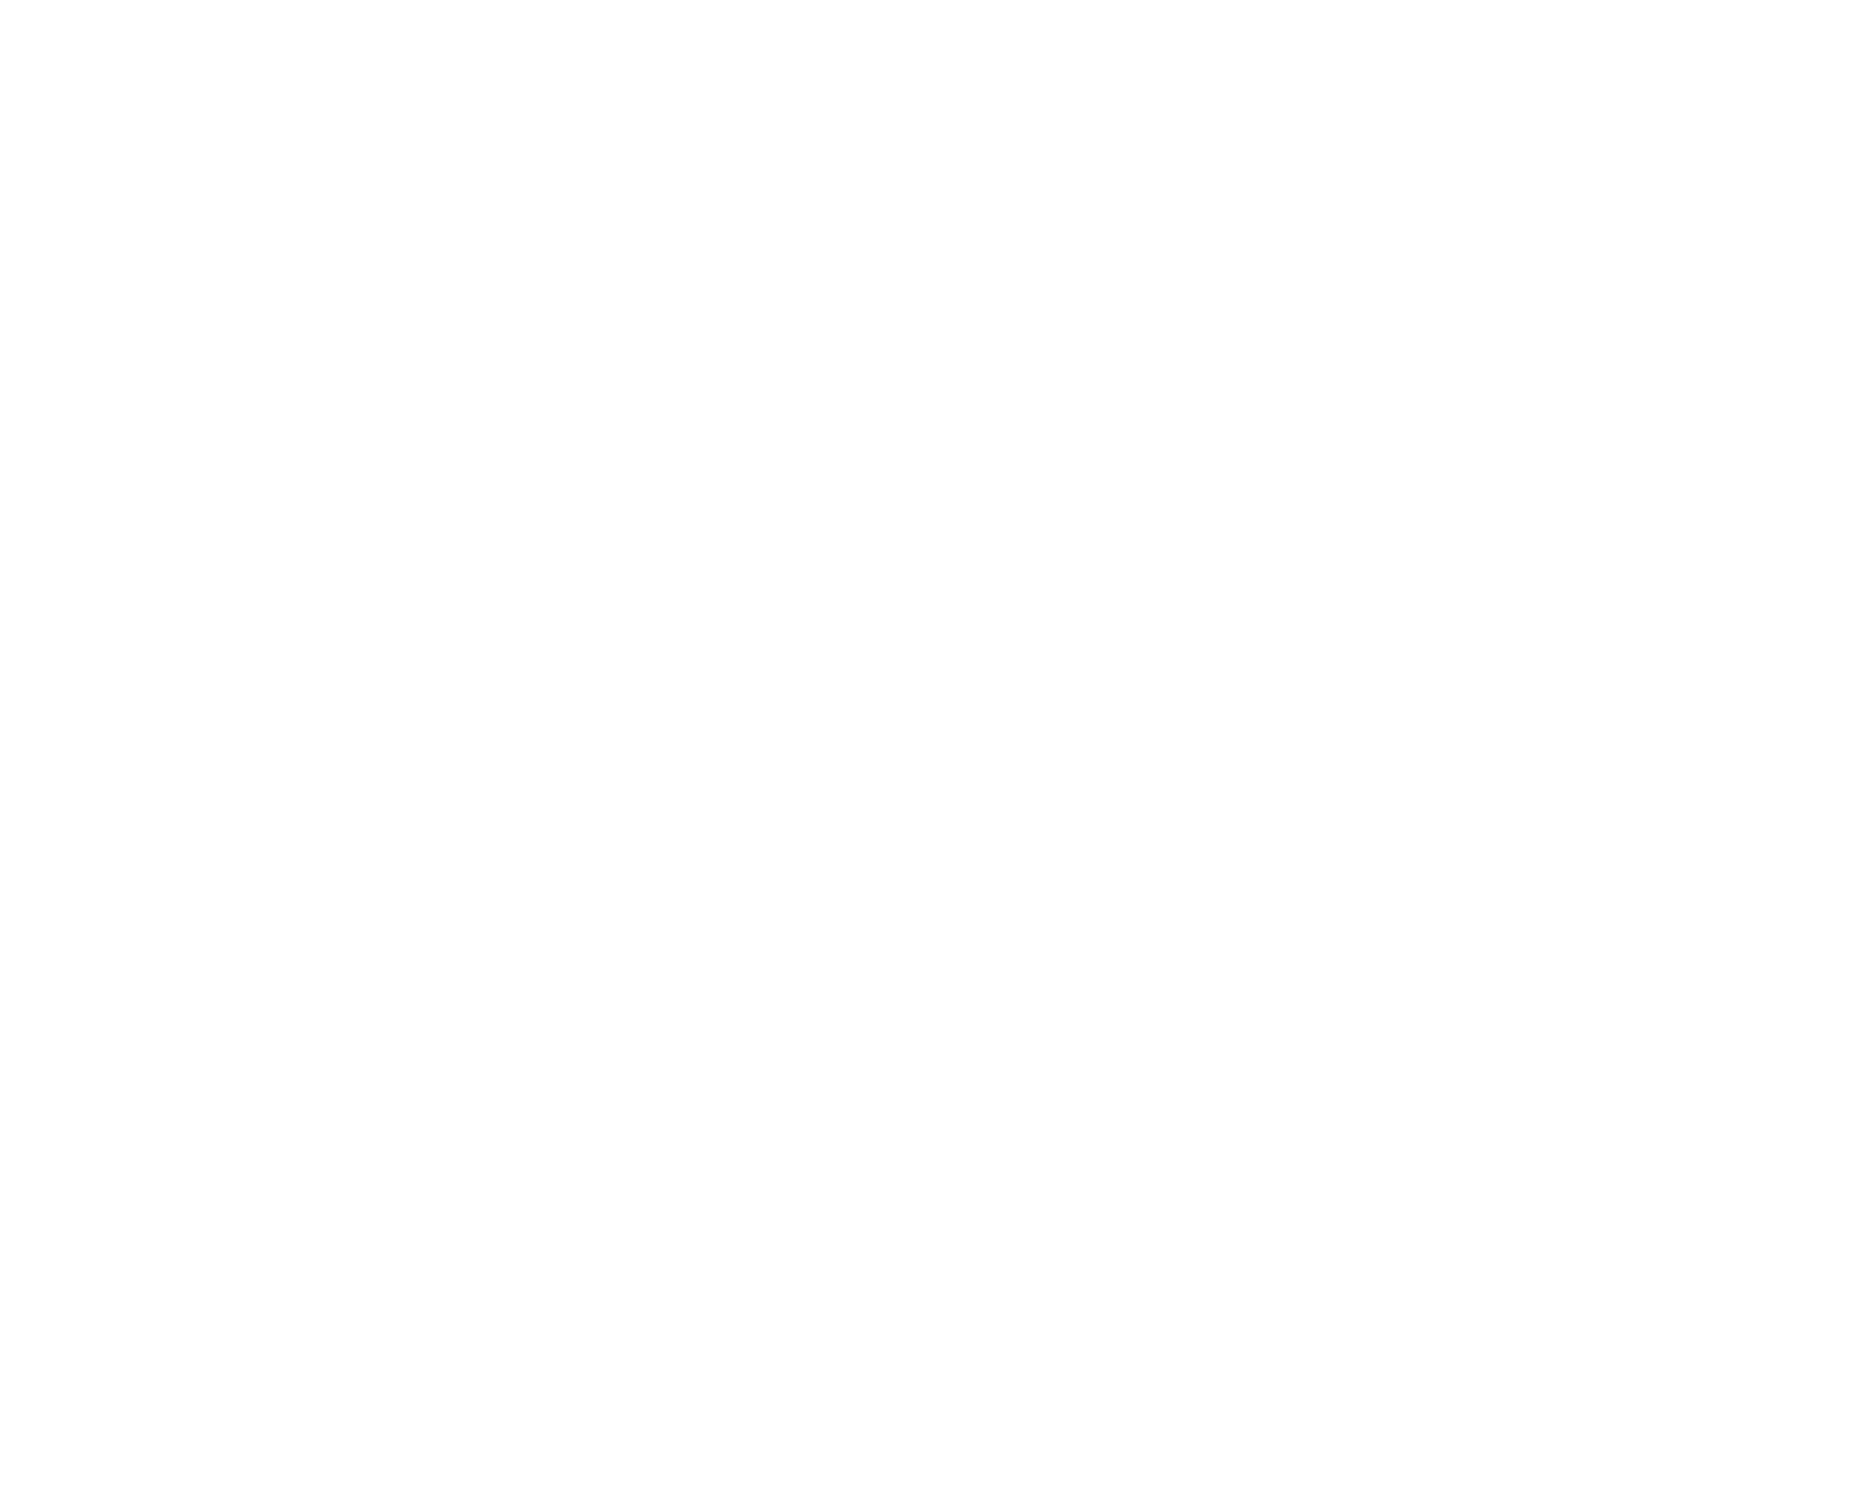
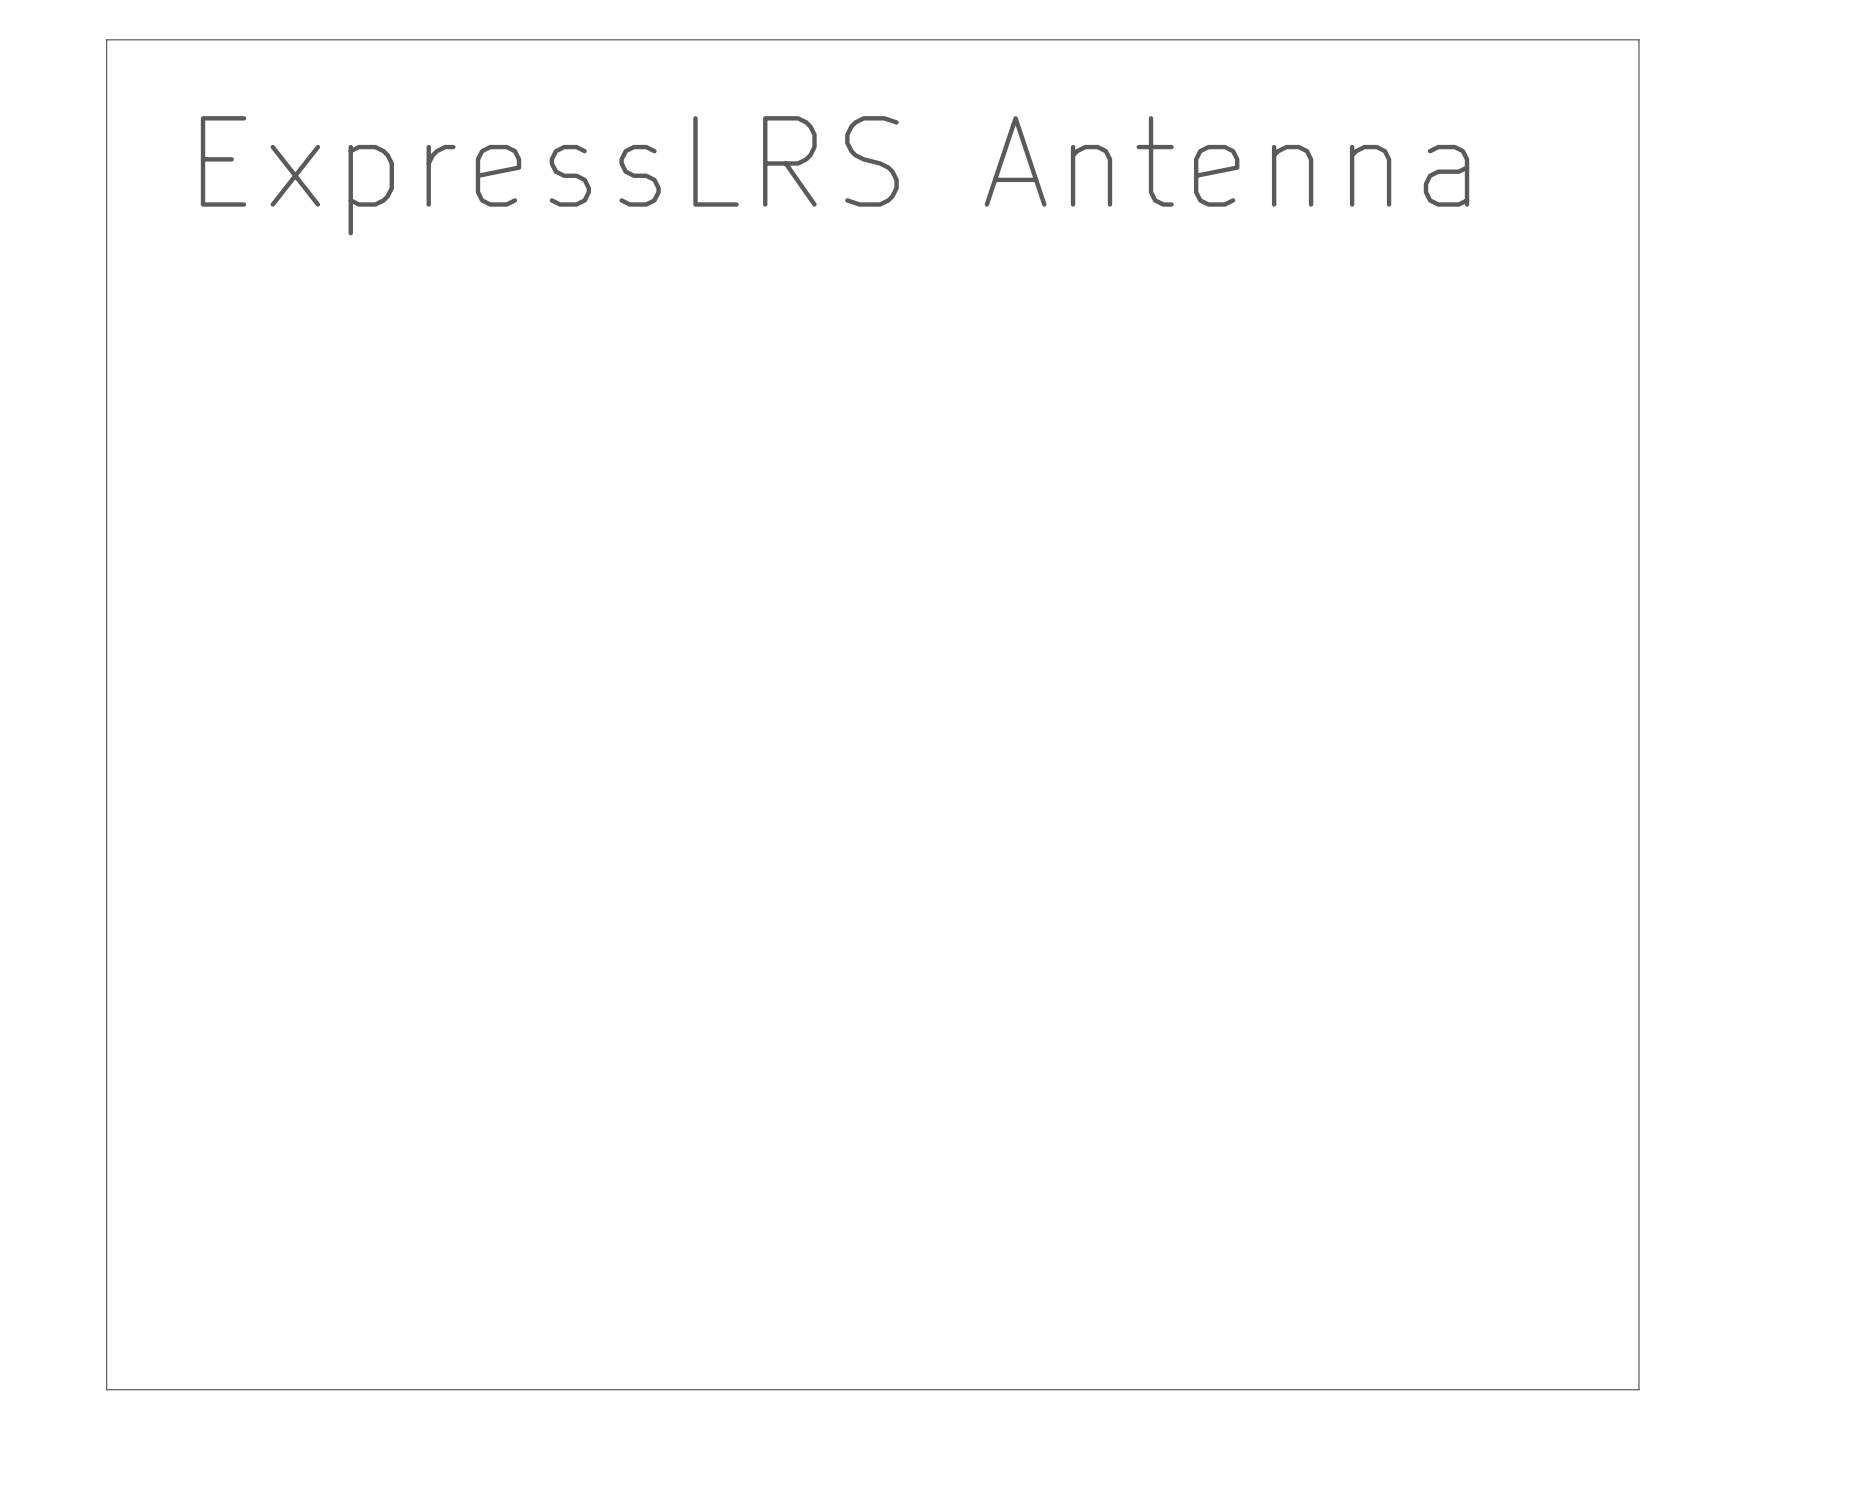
line: none -> (106, 39) (106, 1389) (1638, 1389) (1638, 39) (106, 39)
text: none -> ExpressLRS Antenna (835, 175)

